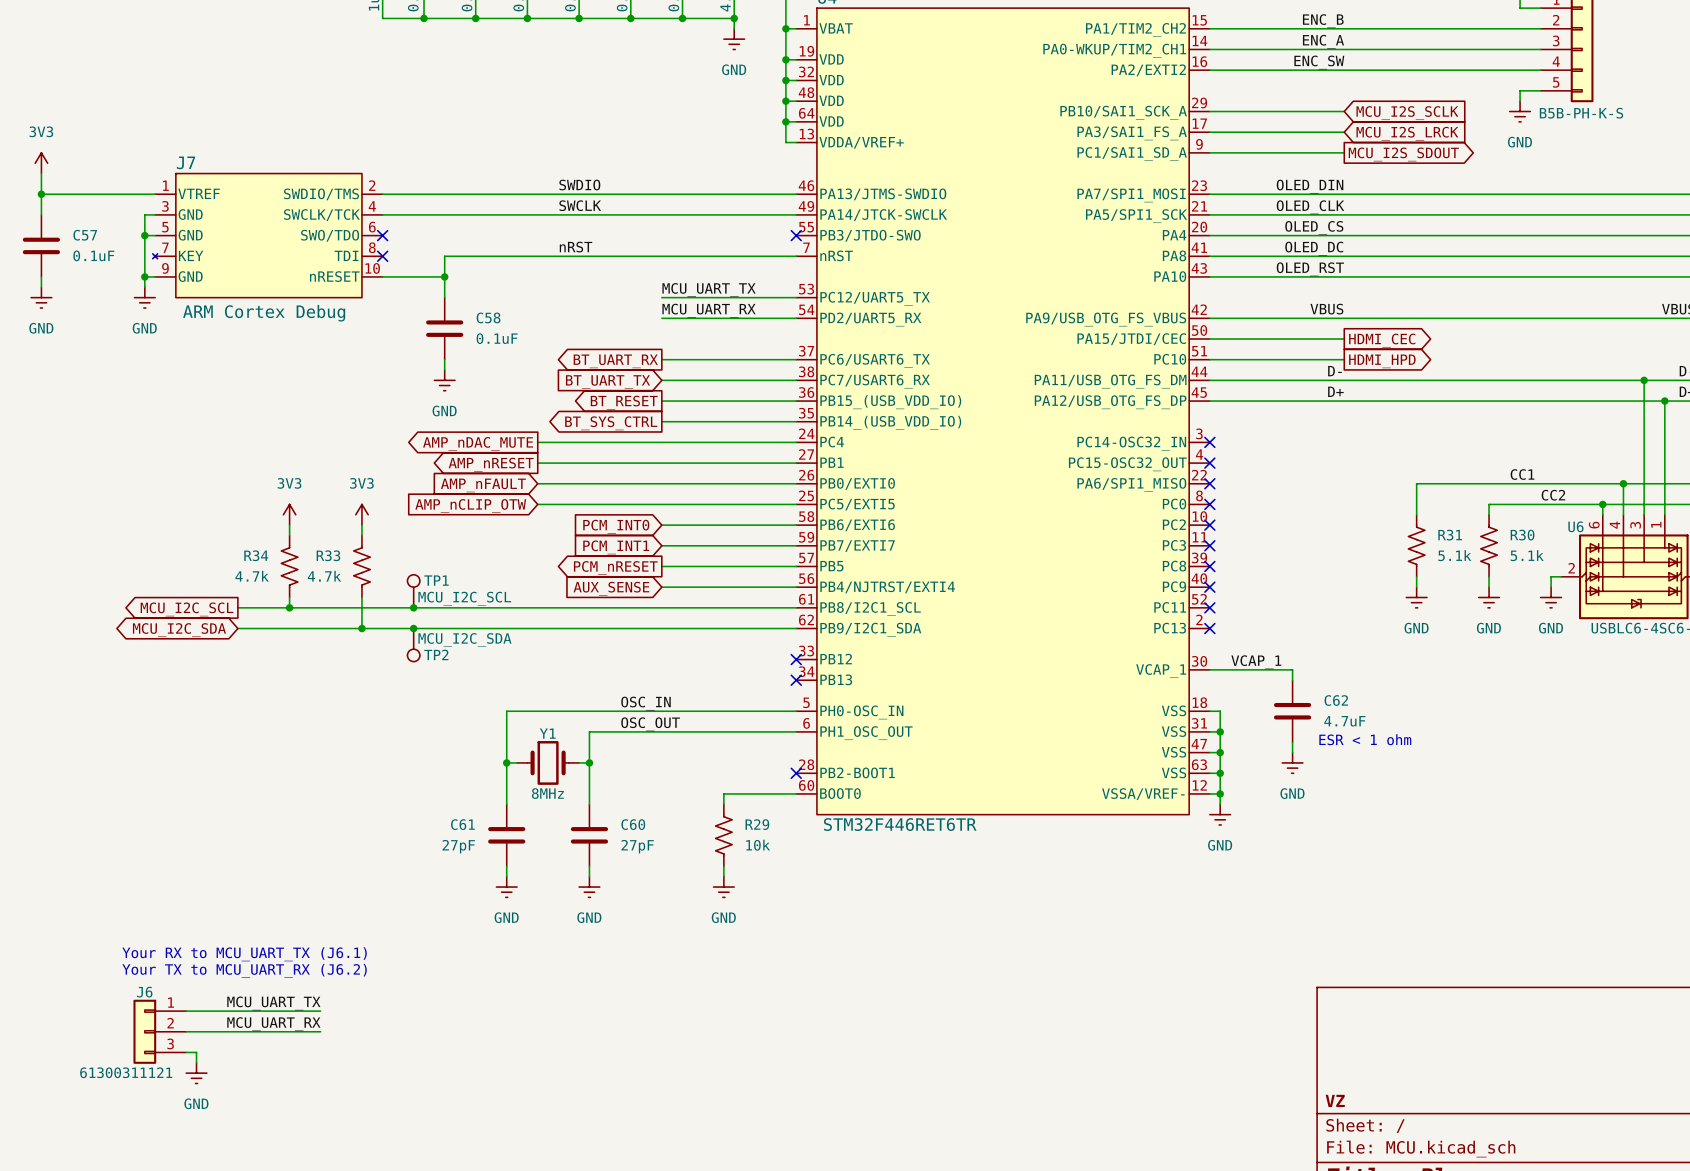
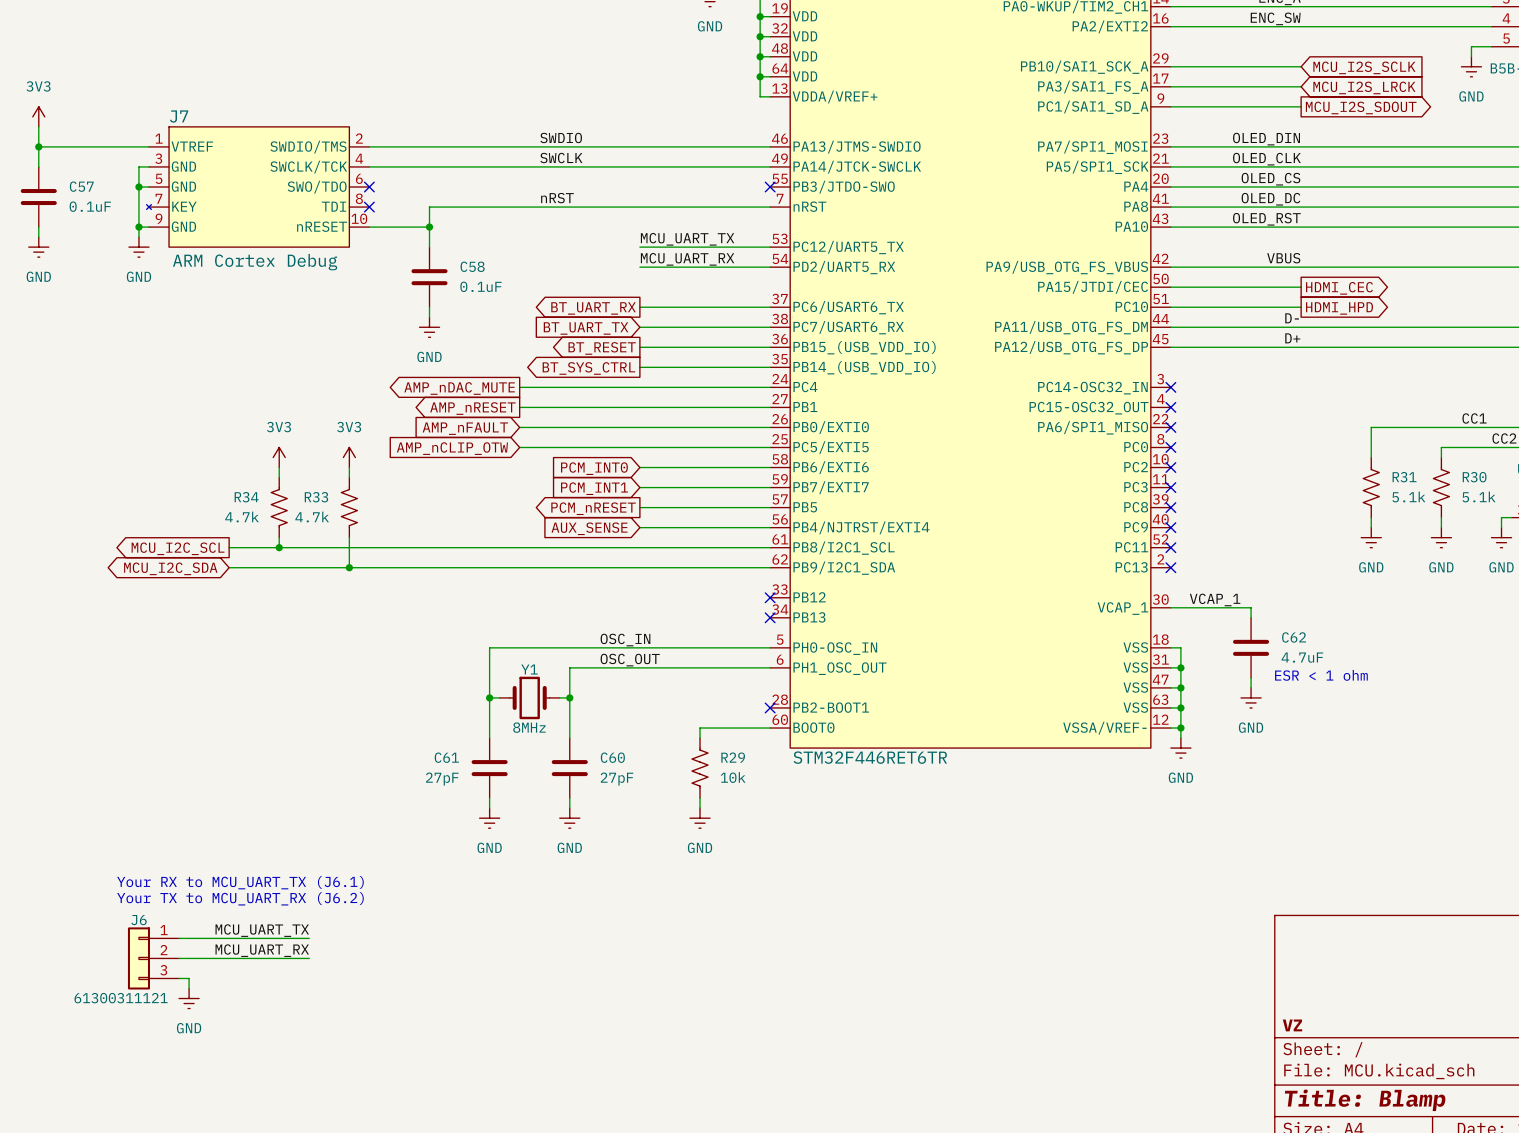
TP1: MCU_I2C_SCL (413, 591) -> none
junction: (413, 607) -> none
junction: (413, 628) -> none
TP2: MCU_I2C_SDA (413, 645) -> none

